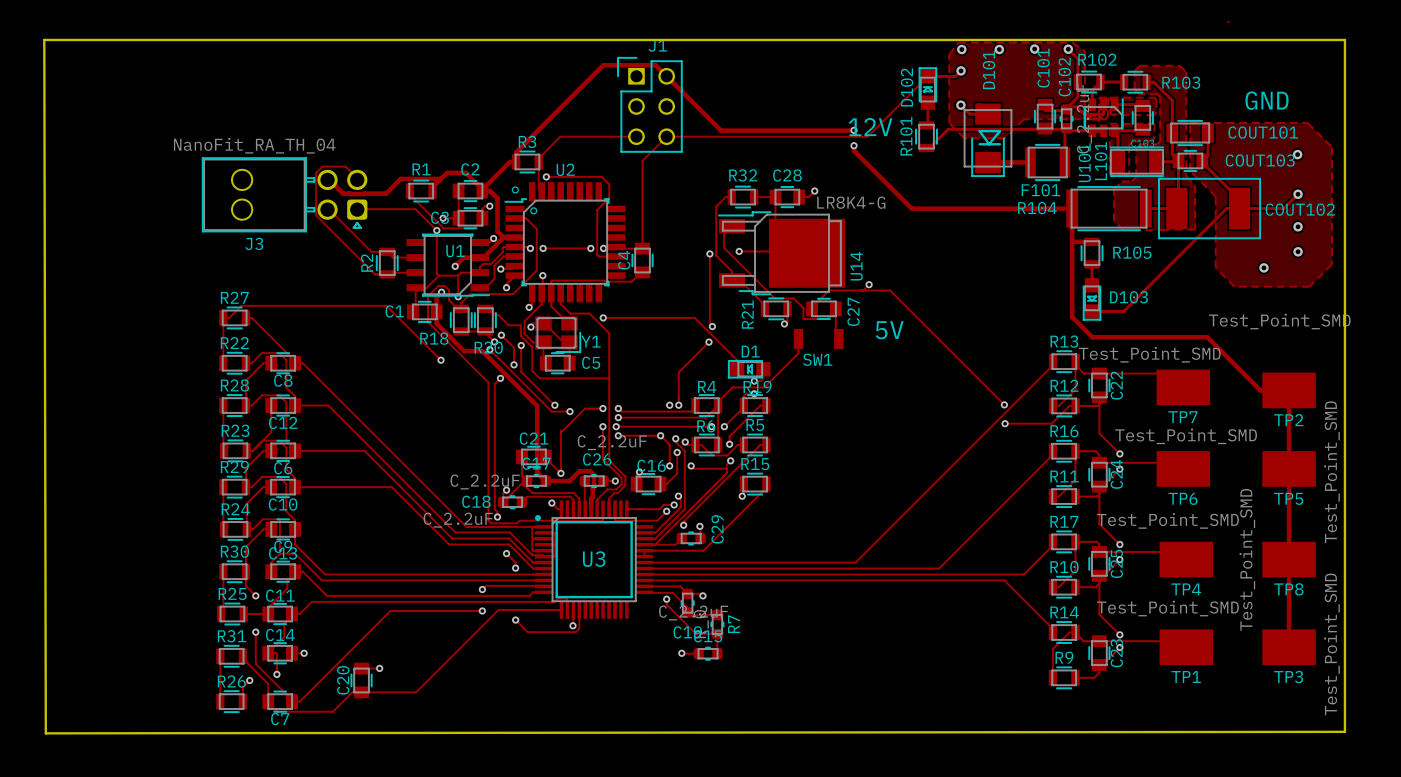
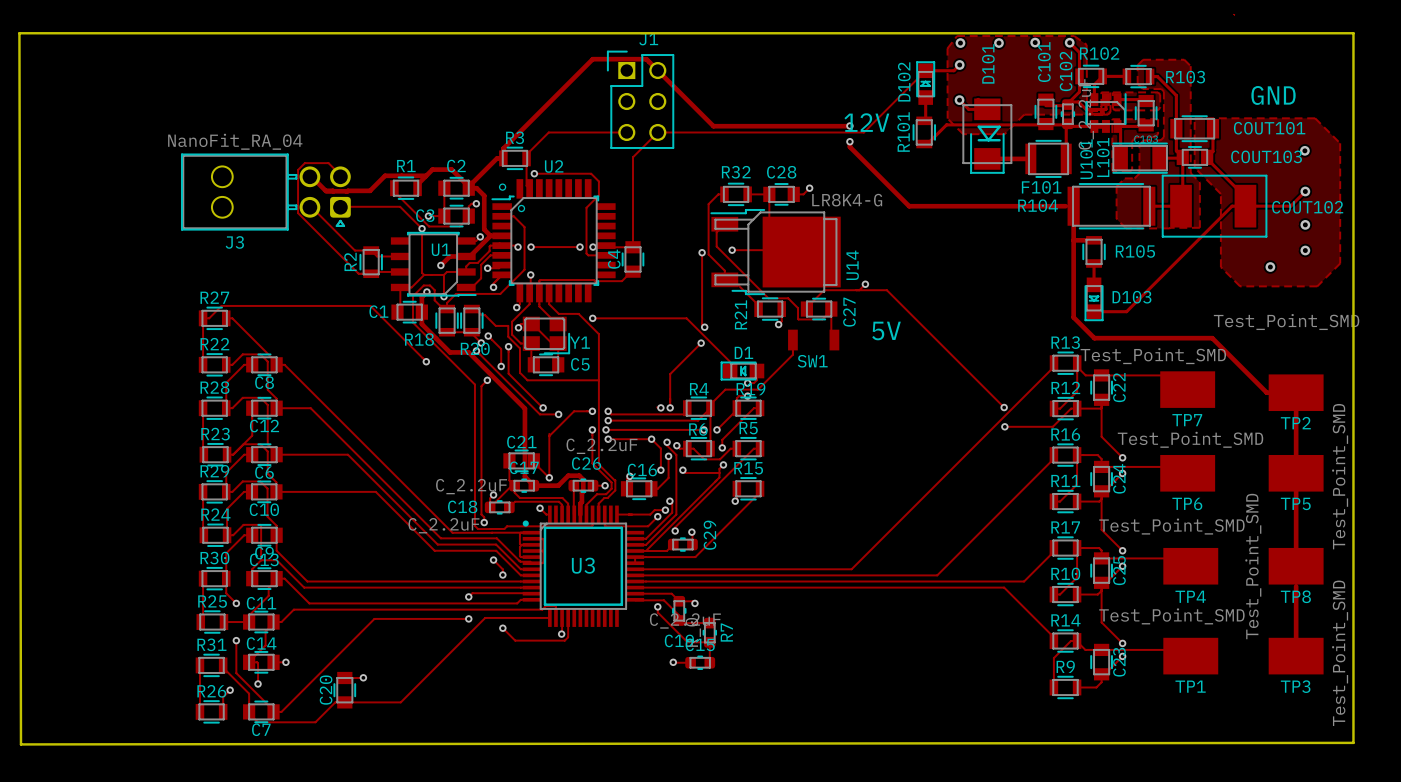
J3 value: NanoFit_RA_TH_04 (254, 145) -> NanoFit_RA_04 (235, 141)

